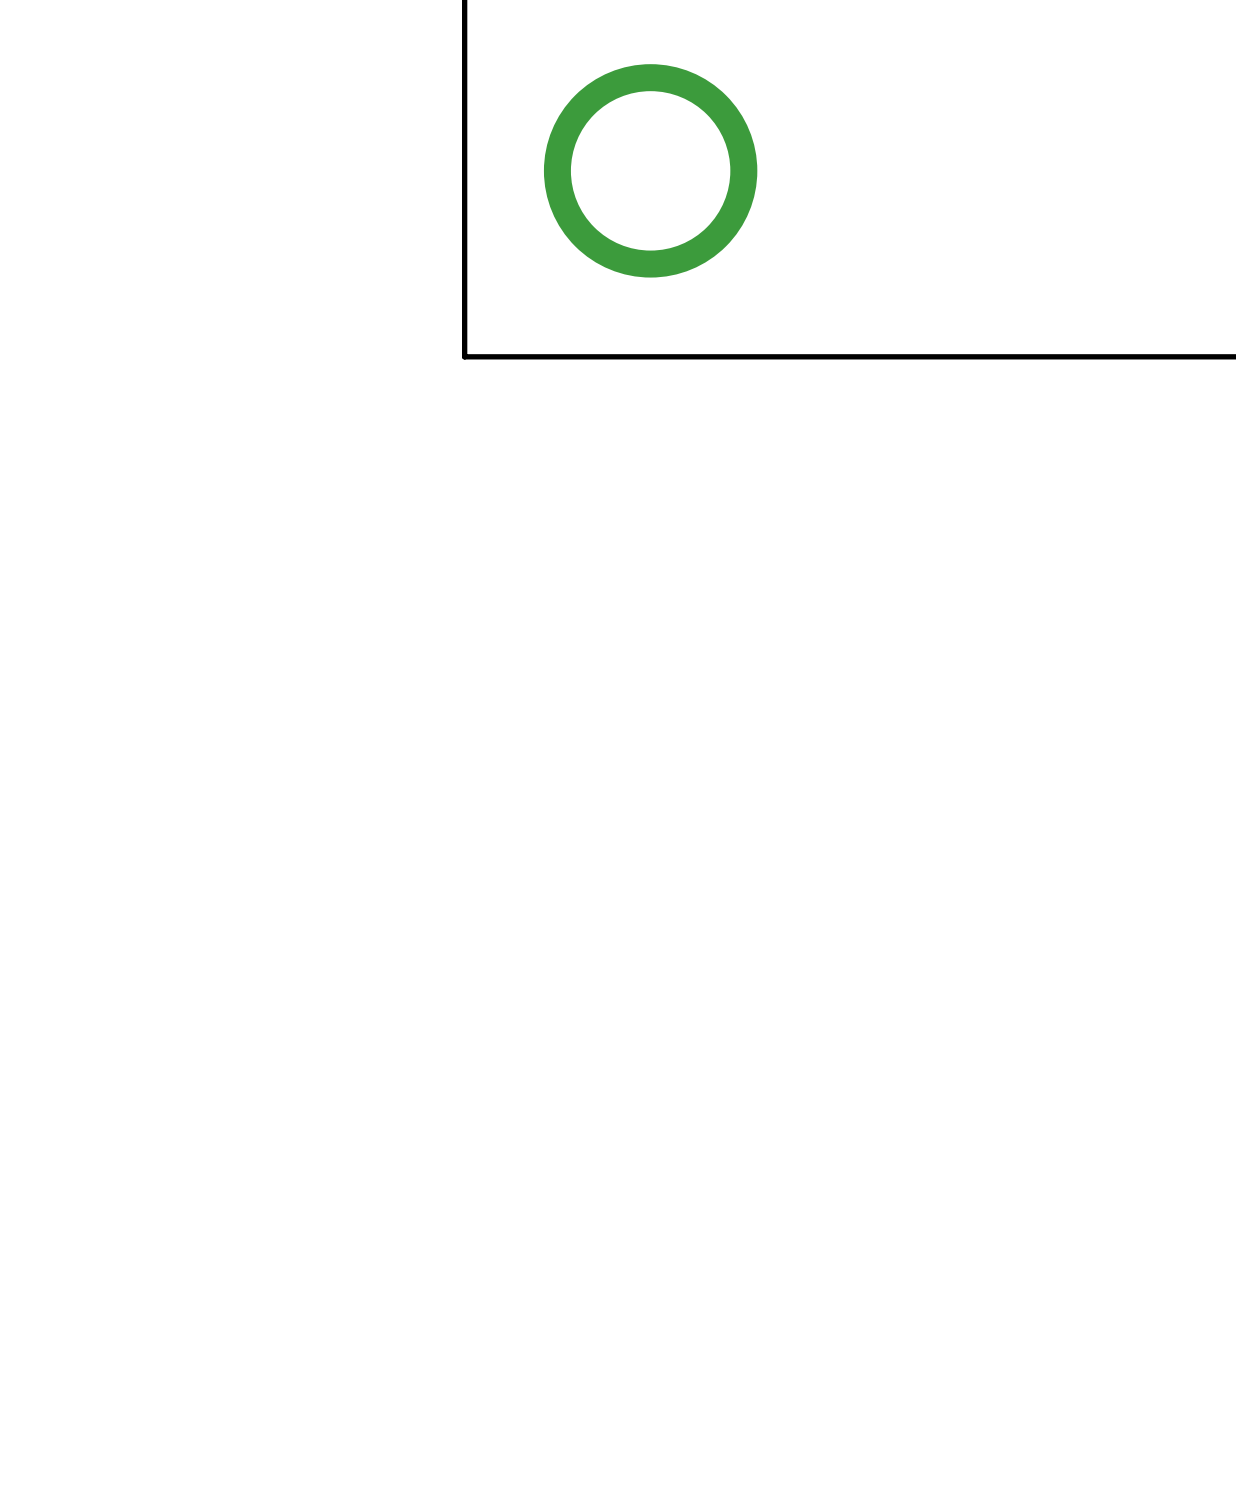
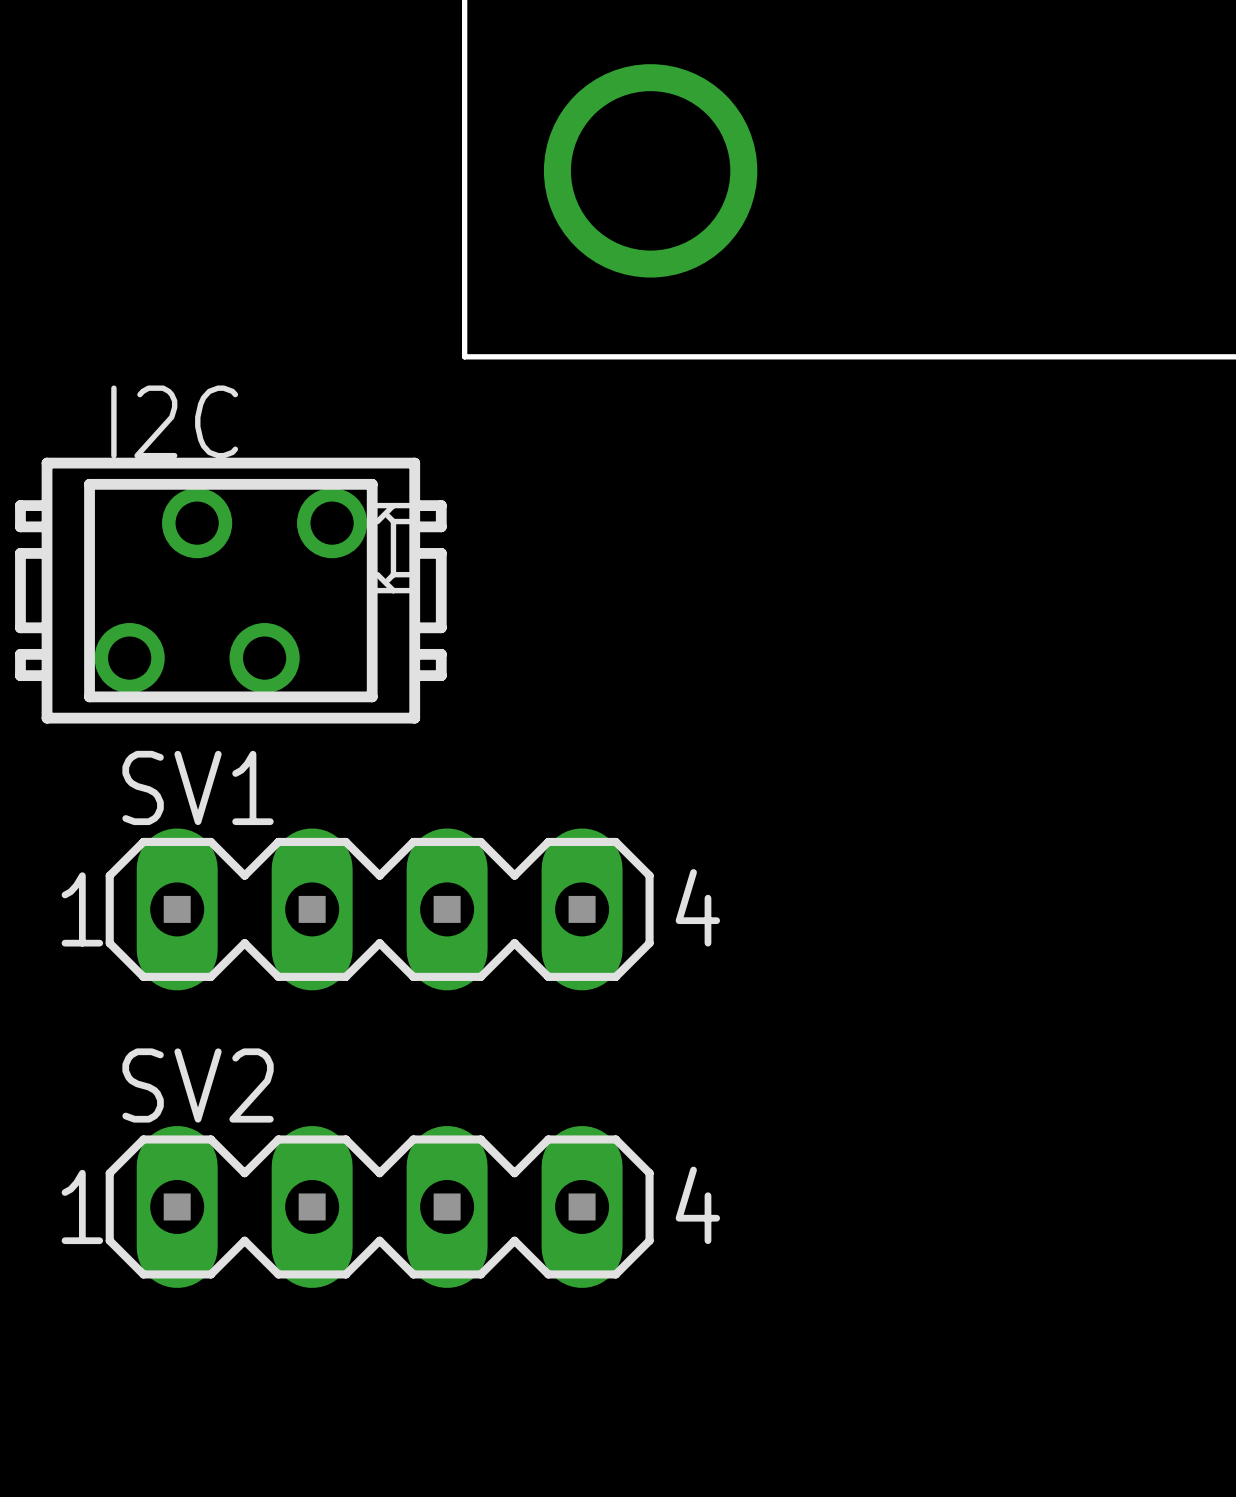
I2C: none -> (230, 590)
SV1: none -> (379, 909)
SV2: none -> (379, 1206)

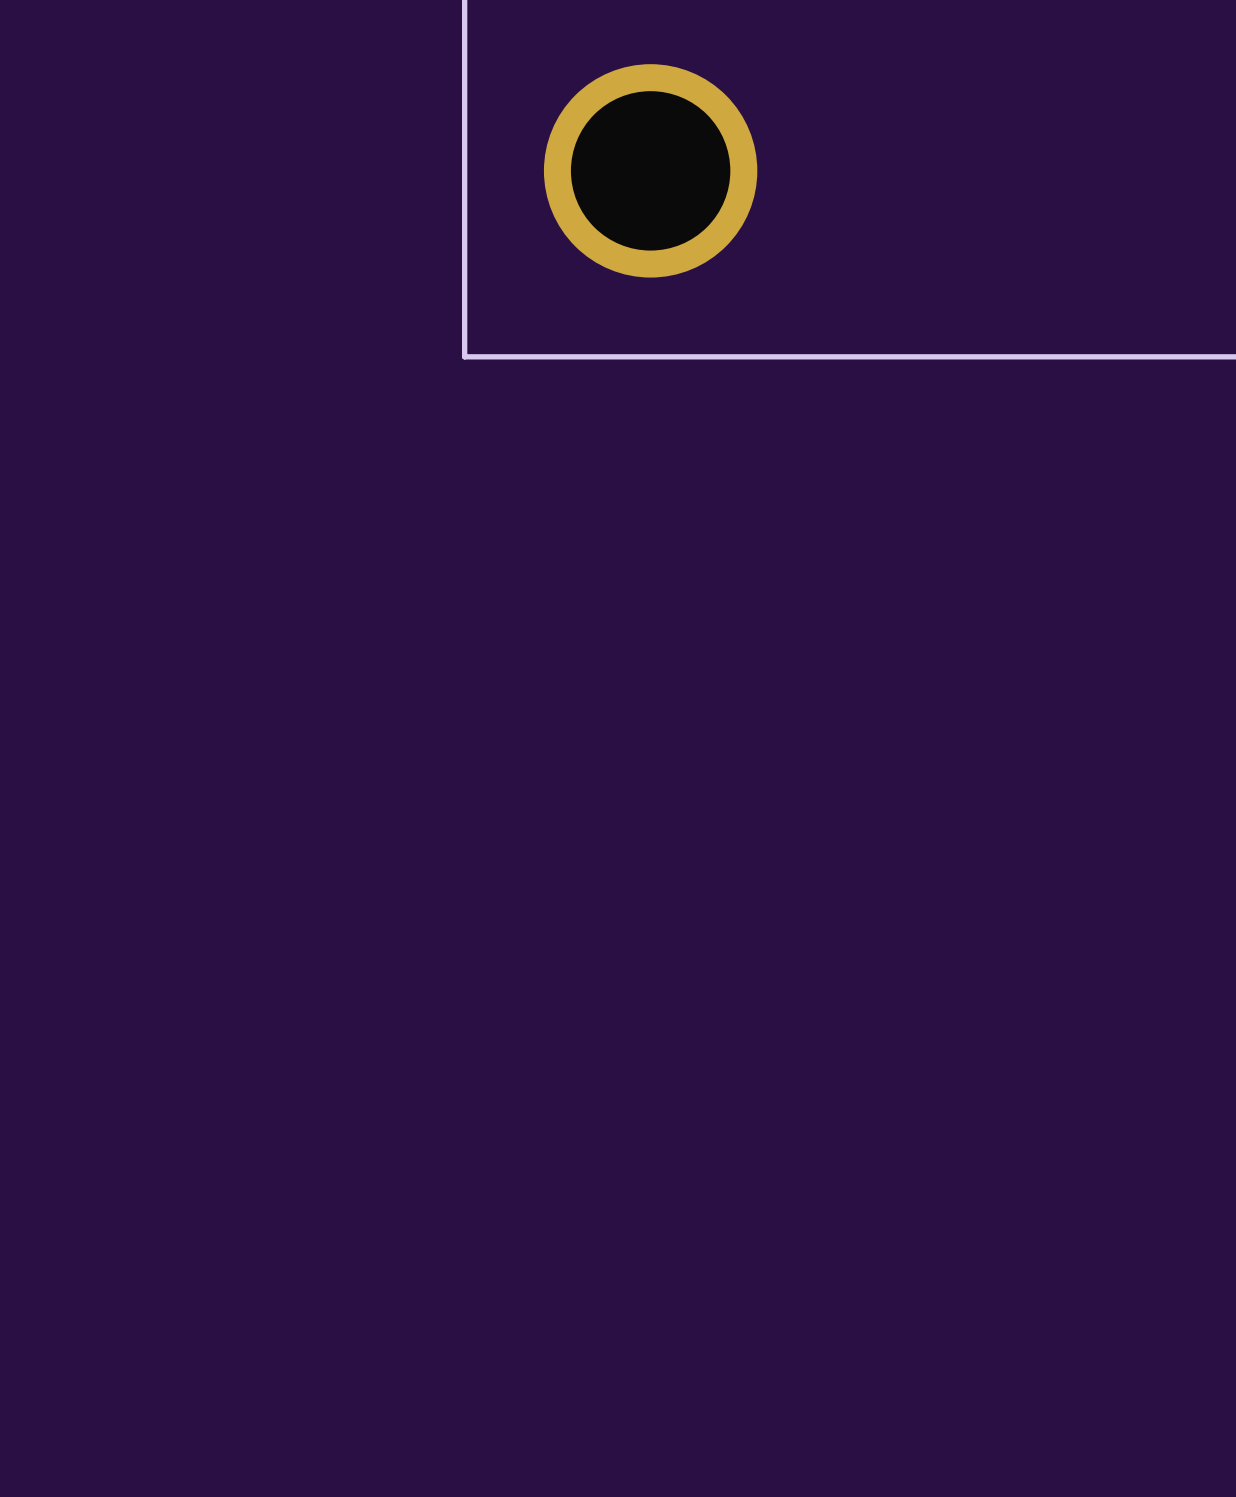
I2C: (230, 590) -> none
SV1: (379, 909) -> none
SV2: (379, 1206) -> none

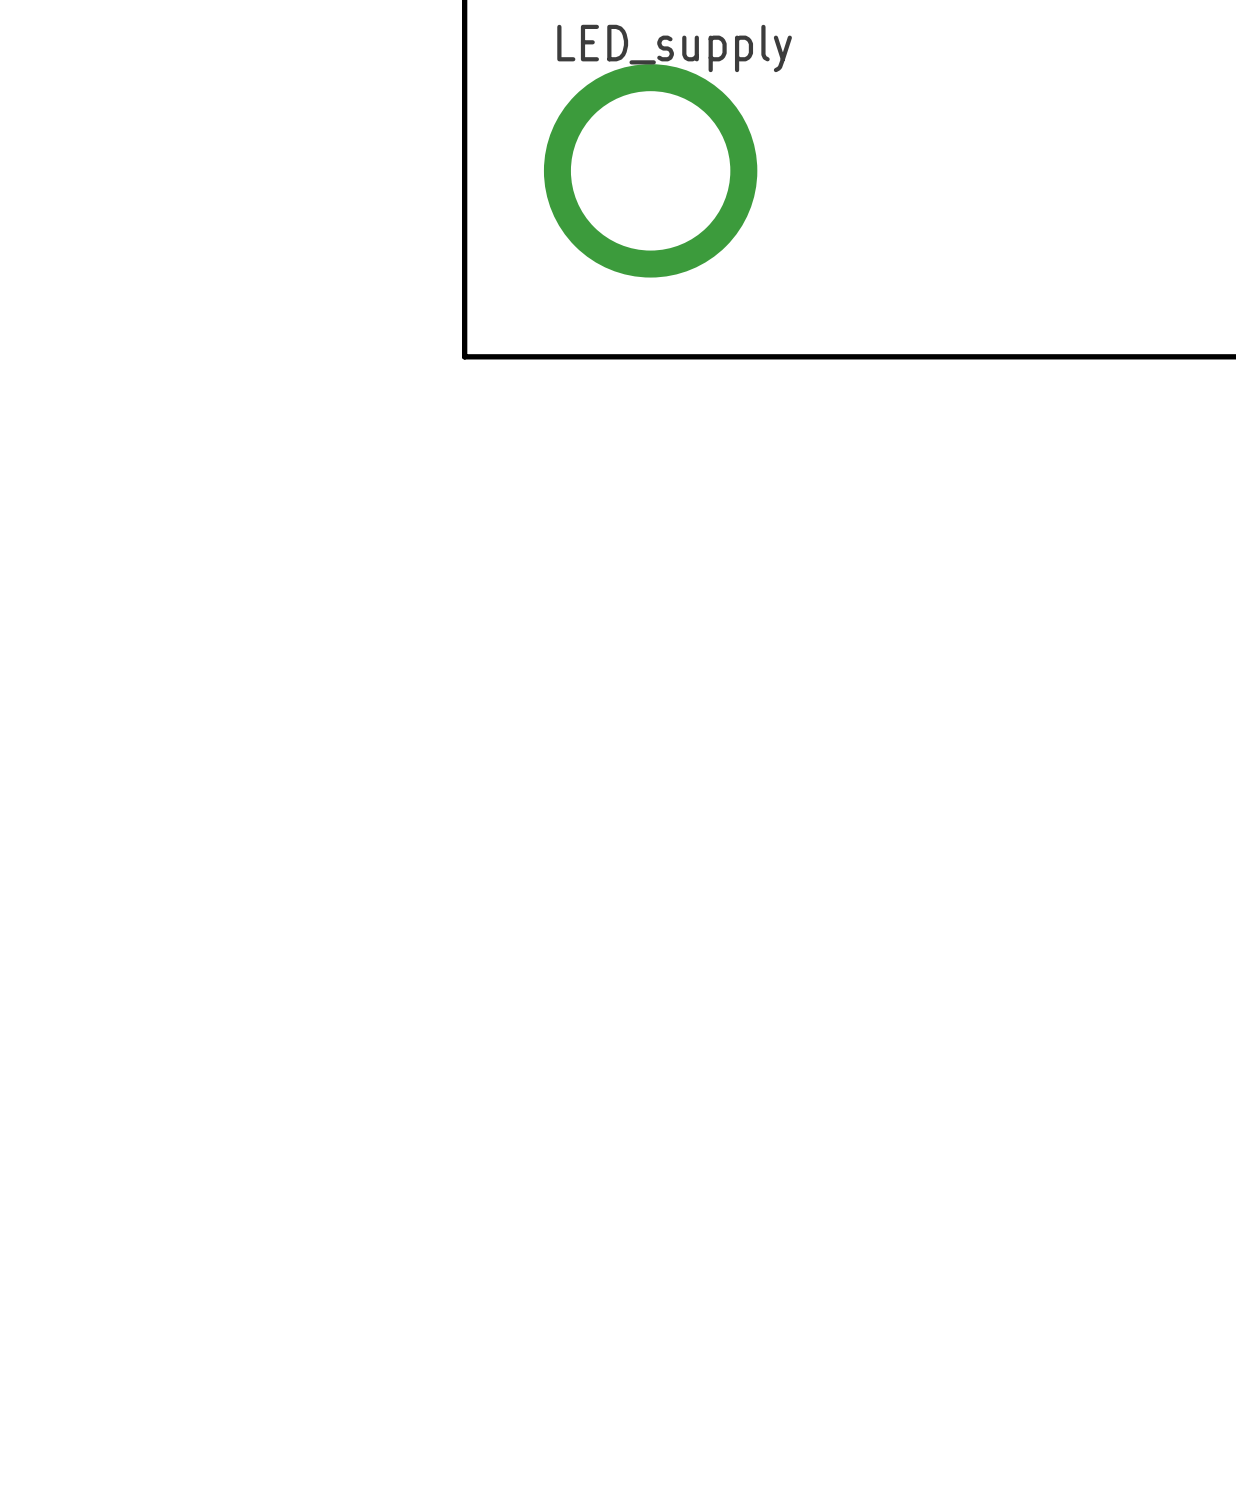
text: none -> LED_supply (674, 48)

